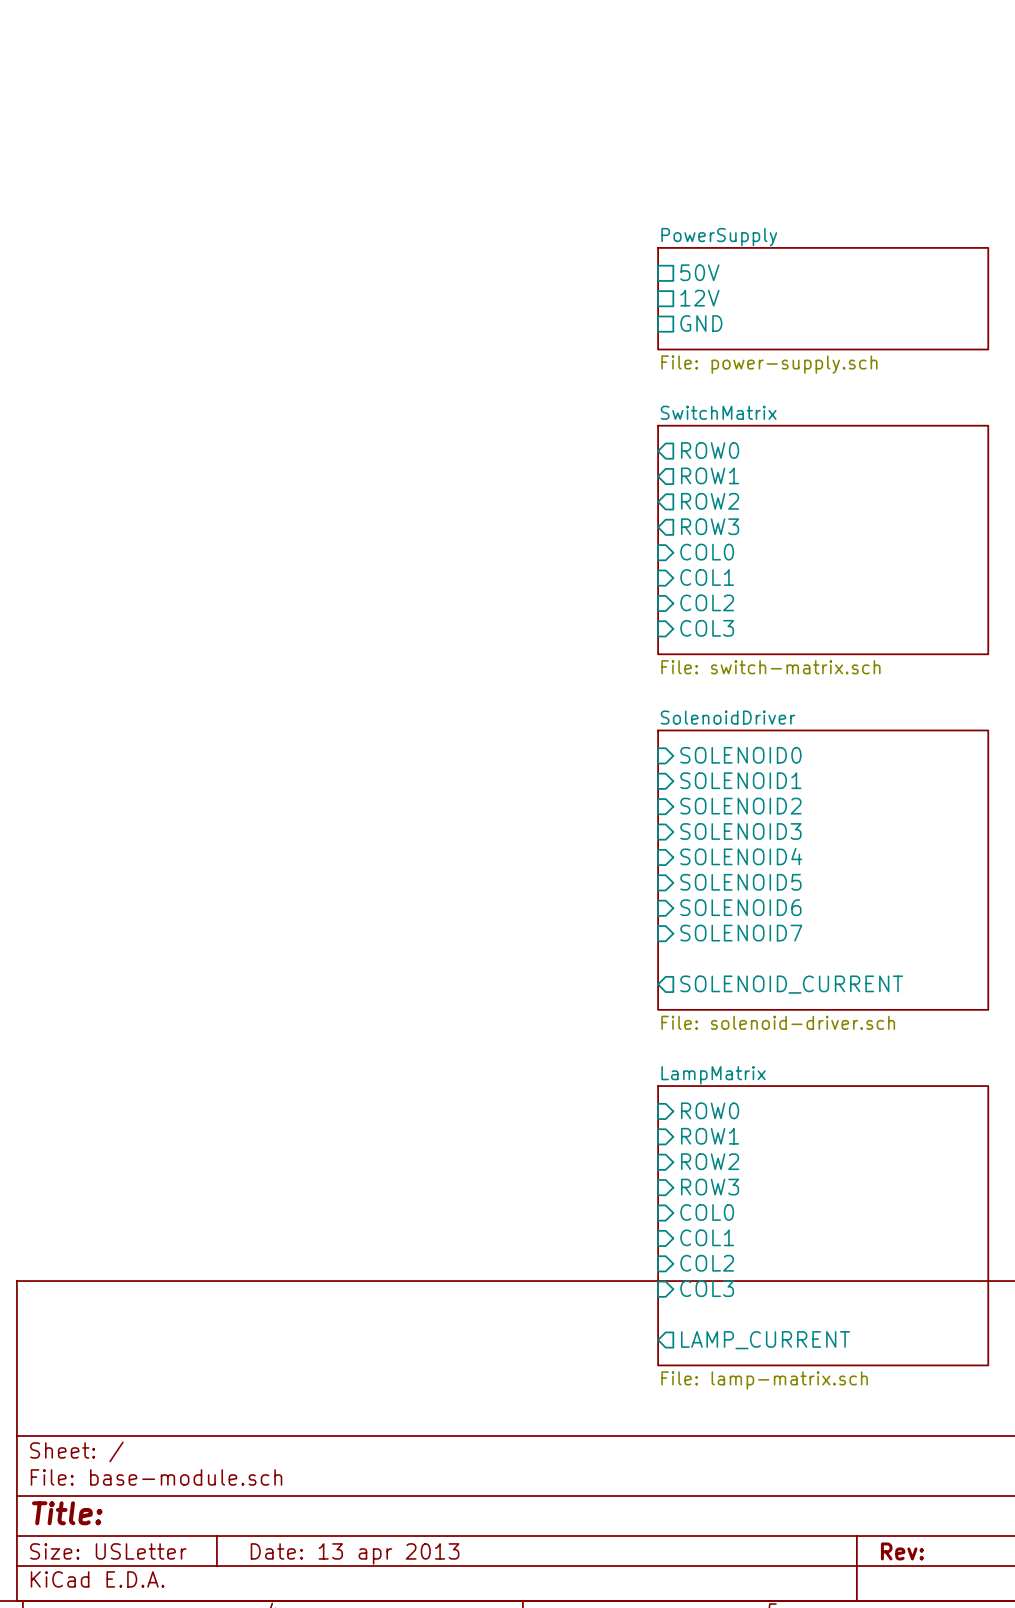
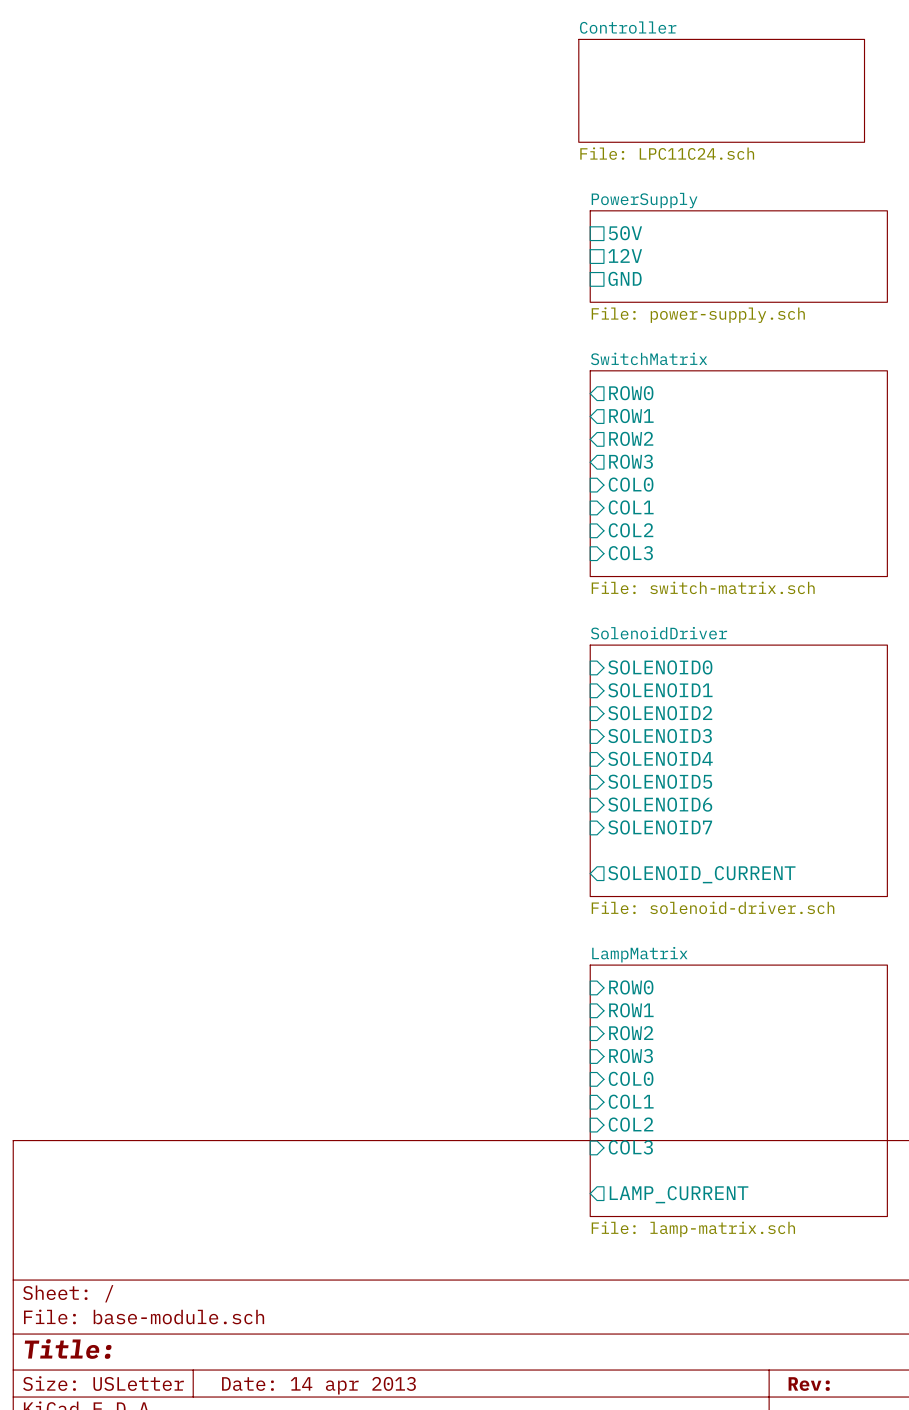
sheet Controller: none -> File: LPC11C24.sch (721, 90)
title block: Date: 13 apr 2013 (355, 1553) -> Date: 14 apr 2013 (318, 1385)

